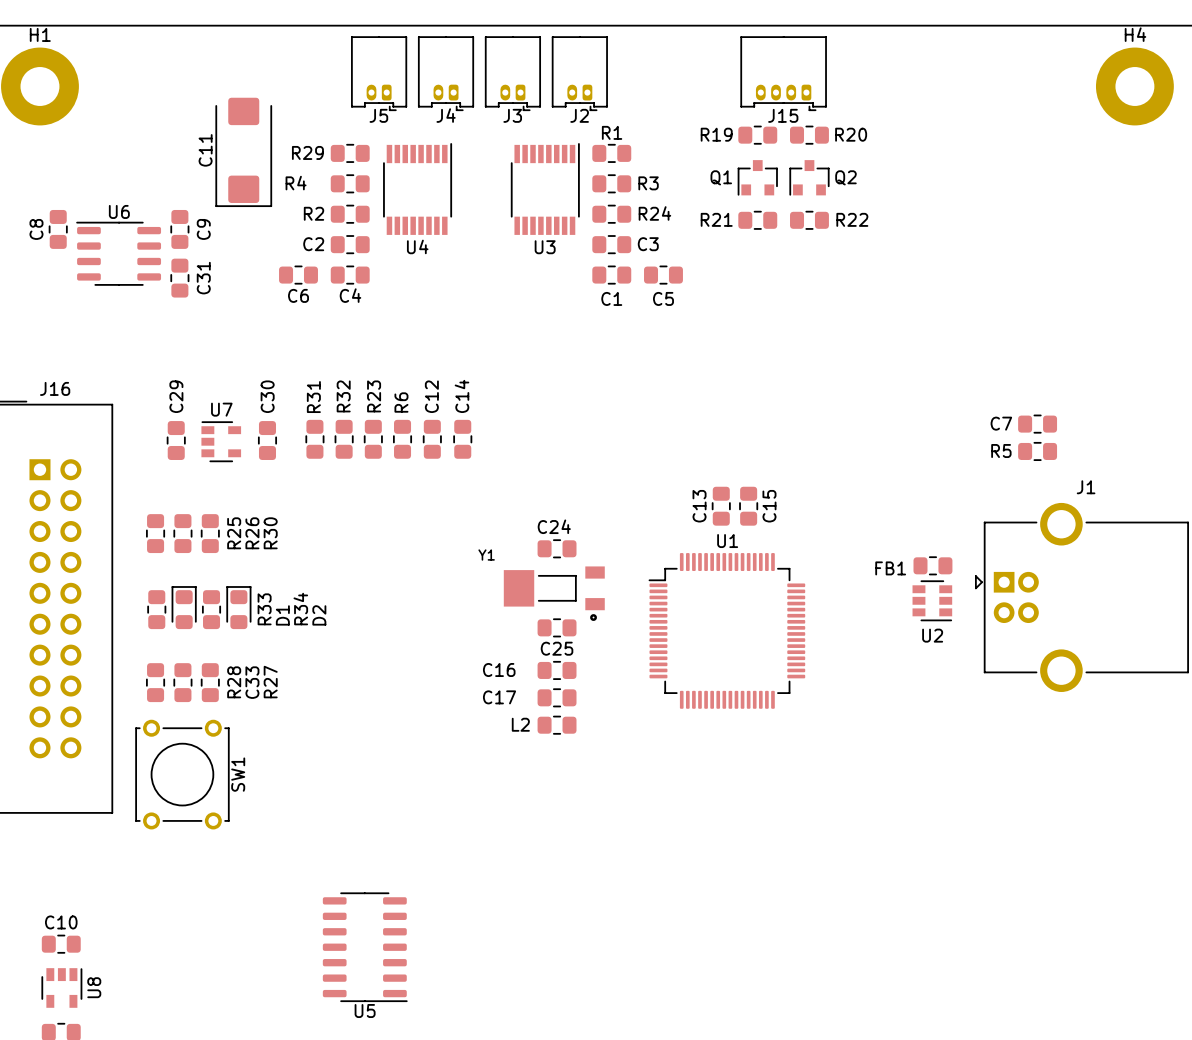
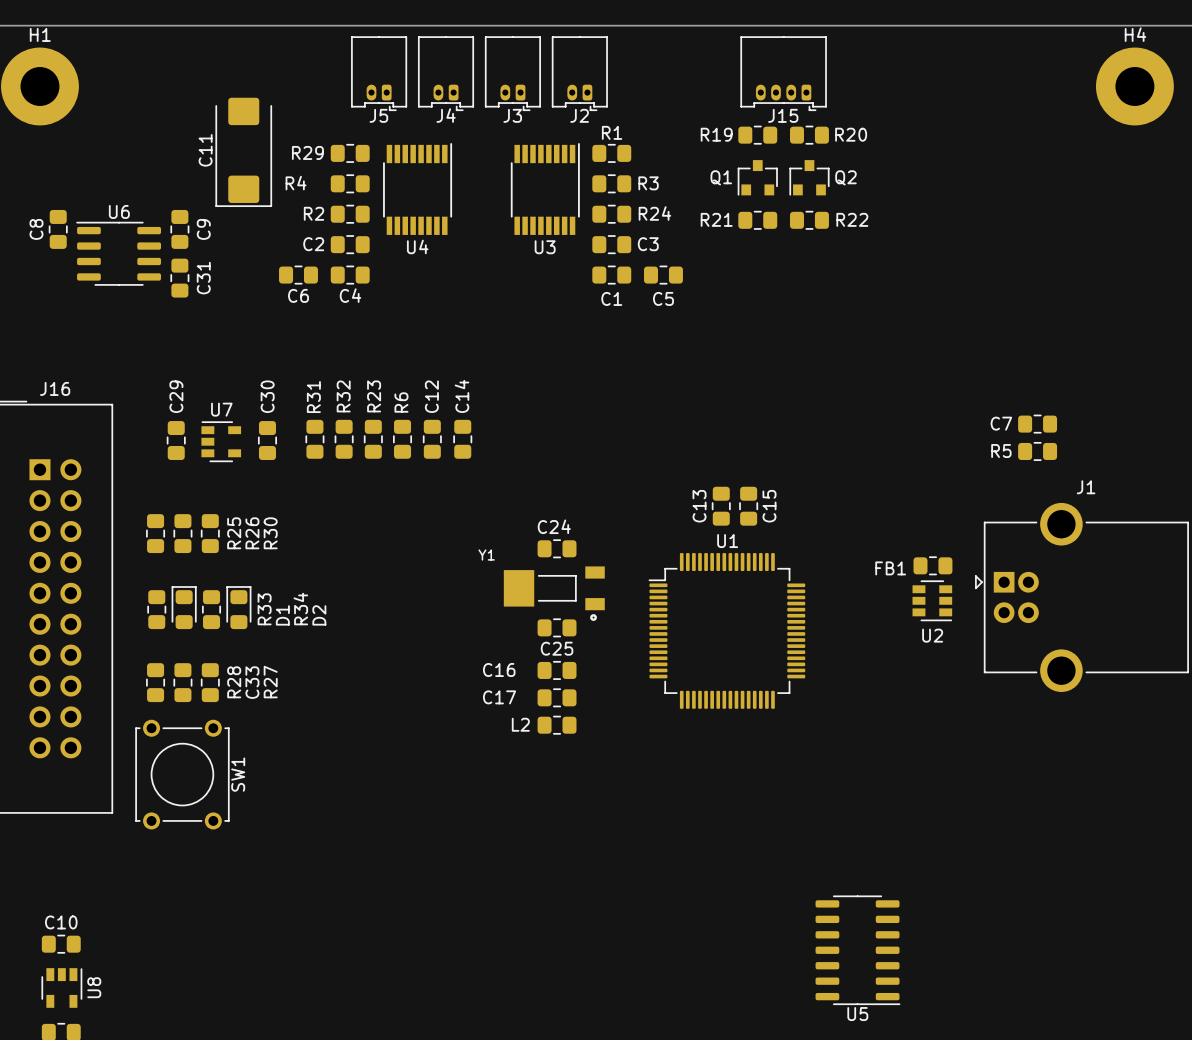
U5 position: (365, 947) -> (857, 950)

